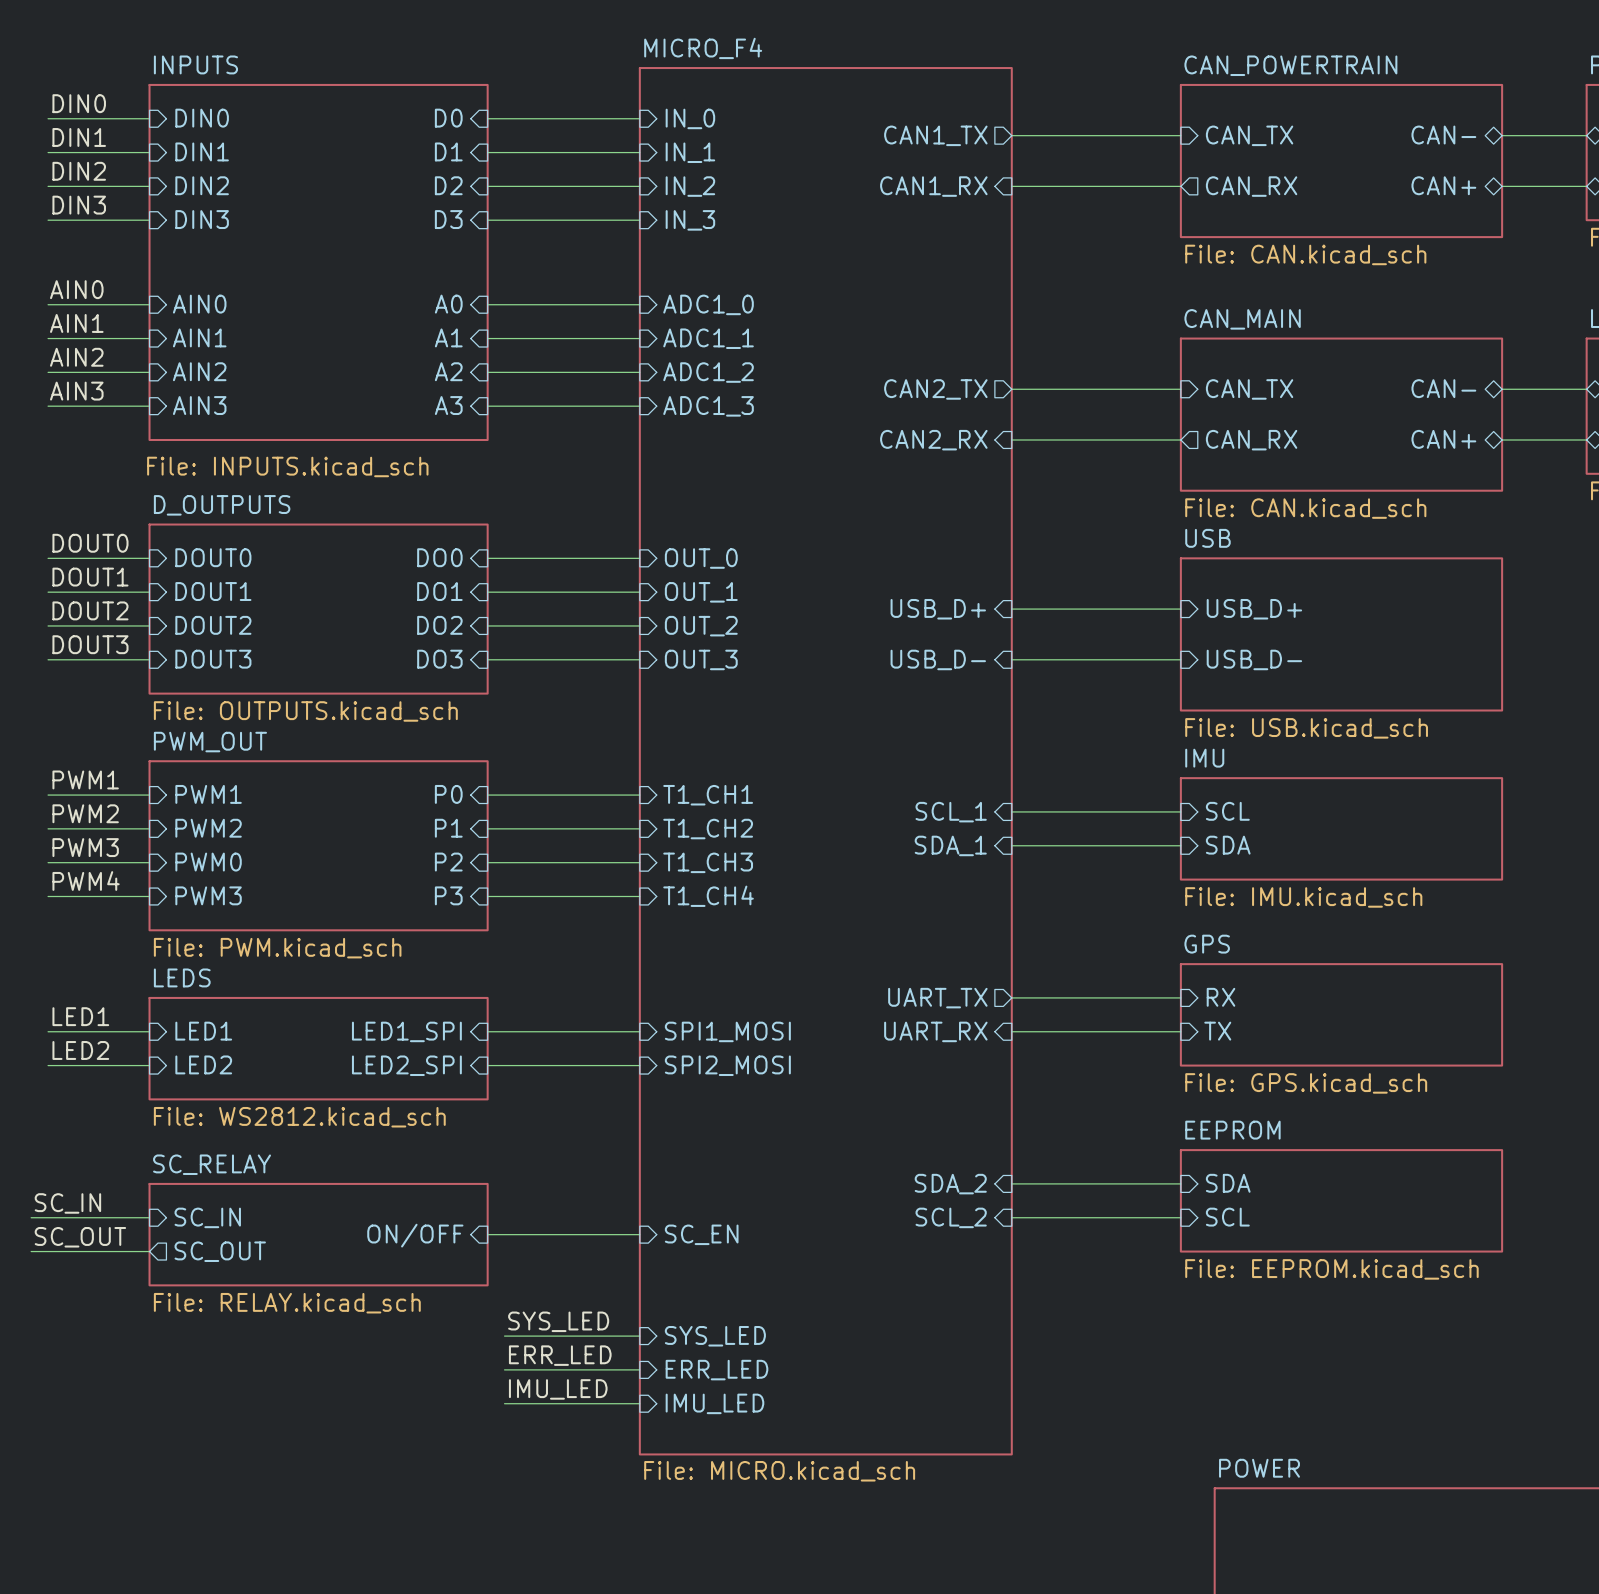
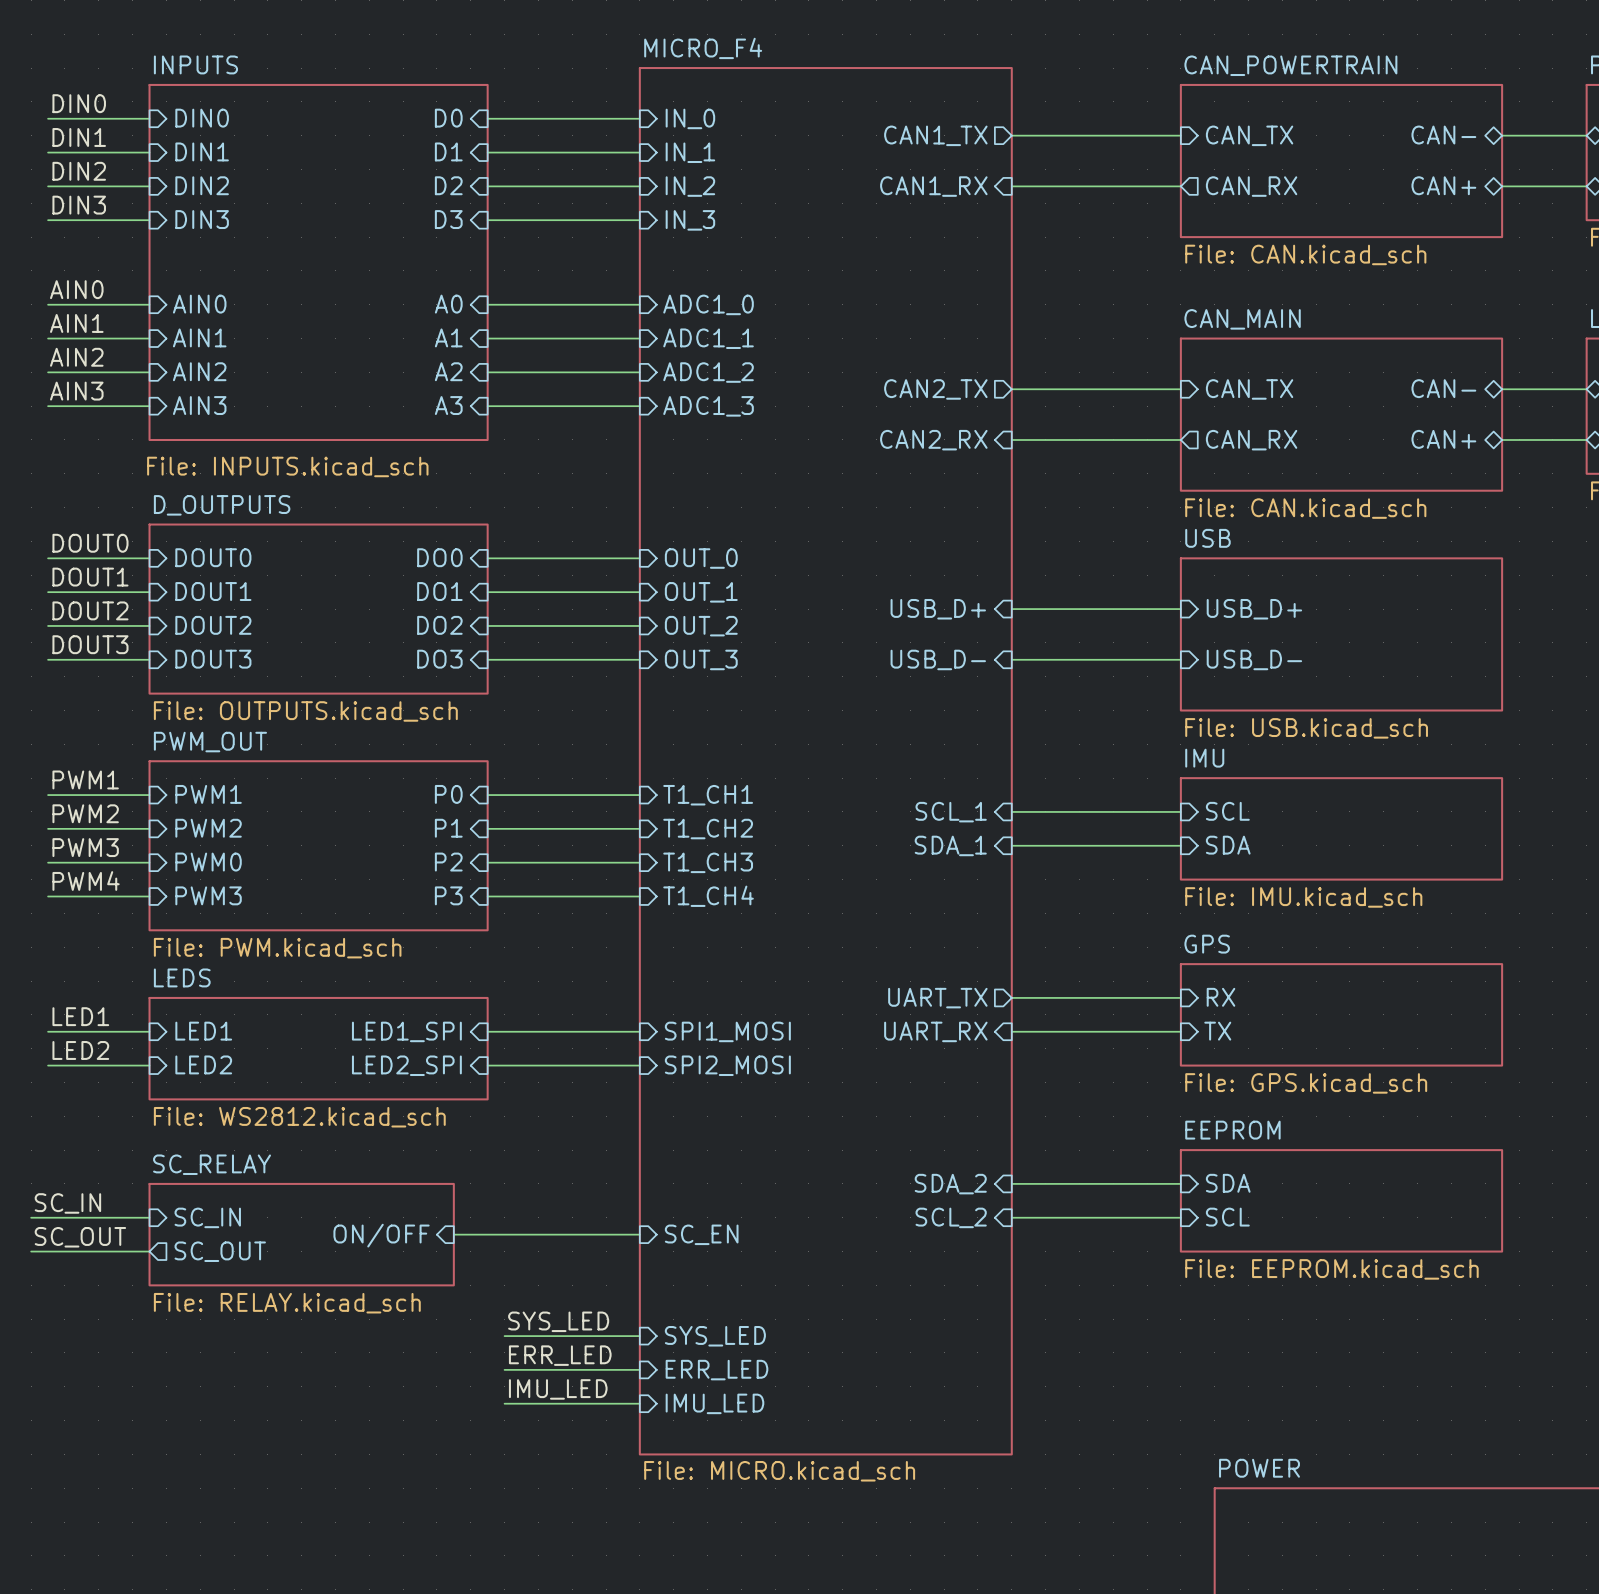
sheet SC_RELAY: none -> File: RELAY.kicad_sch (301, 1234)
sheet SC_RELAY: File: RELAY.kicad_sch (318, 1234) -> none
wire: none -> (453, 1234) (487, 1234)
sheet pin position: ON/OFF (415, 1235) -> ON/OFF (381, 1235)

